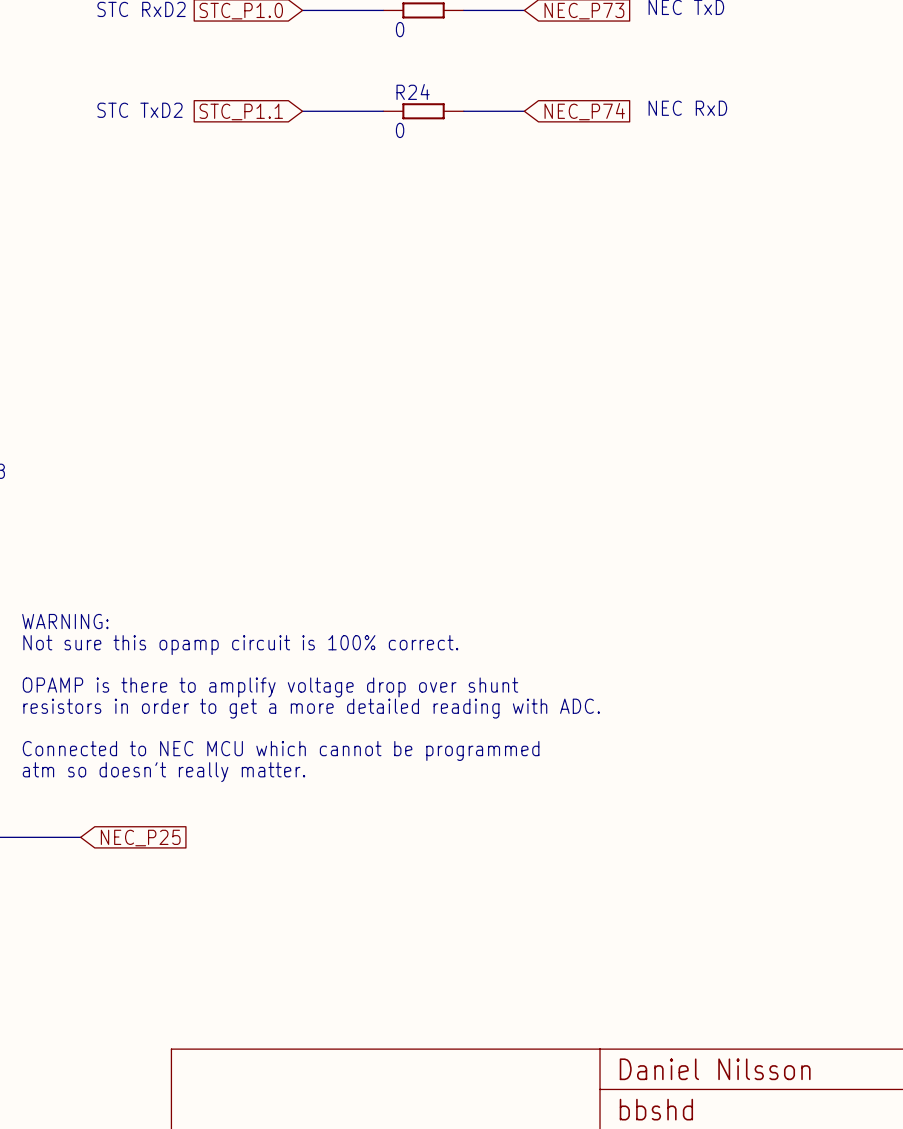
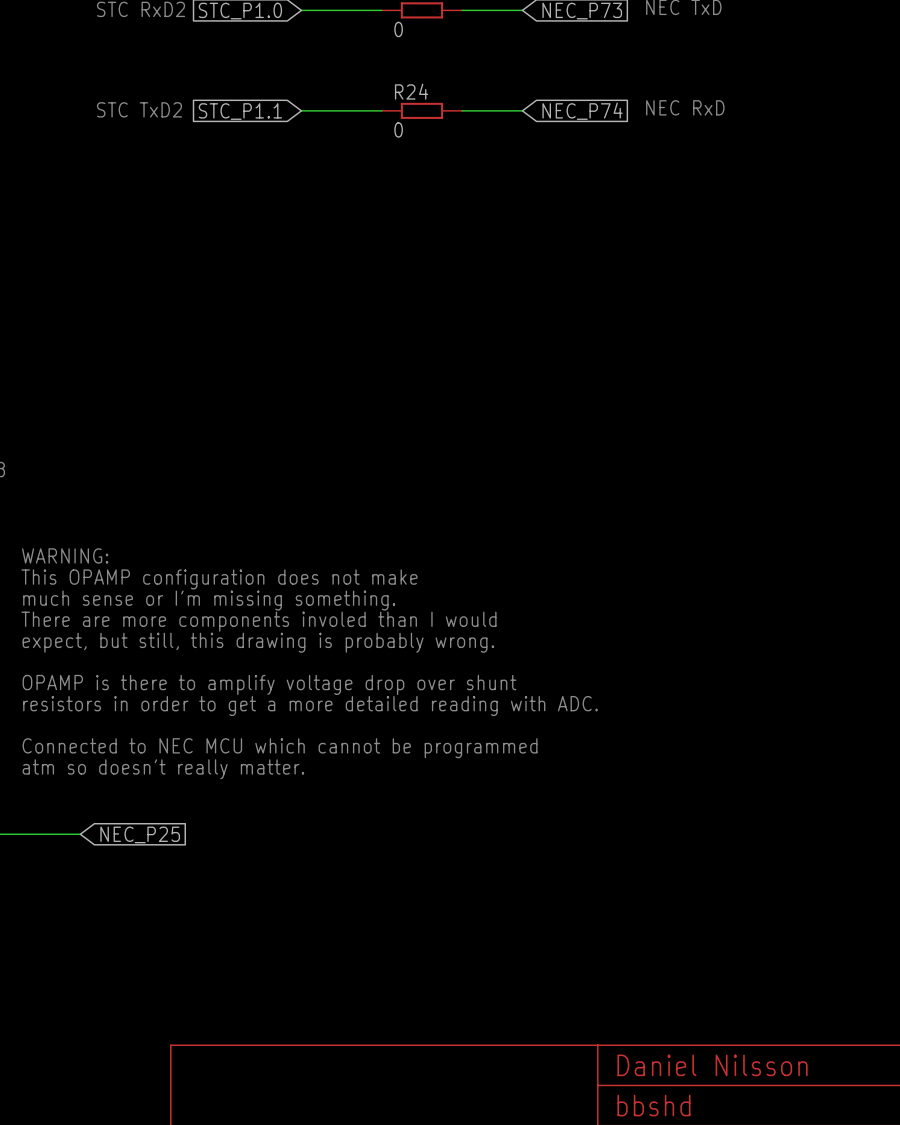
text: none -> WARNING: (65, 555)
text: none -> This OPAMP configuration does not make (219, 579)
text: none -> much sense or I'm missing something. (209, 600)
text: WARNING: (65, 621) -> There are more components involed than I would (258, 621)
text: Not sure this opamp circuit is 100% correct. (240, 645) -> expect, but still, this drawing is probably wrong. (258, 642)

